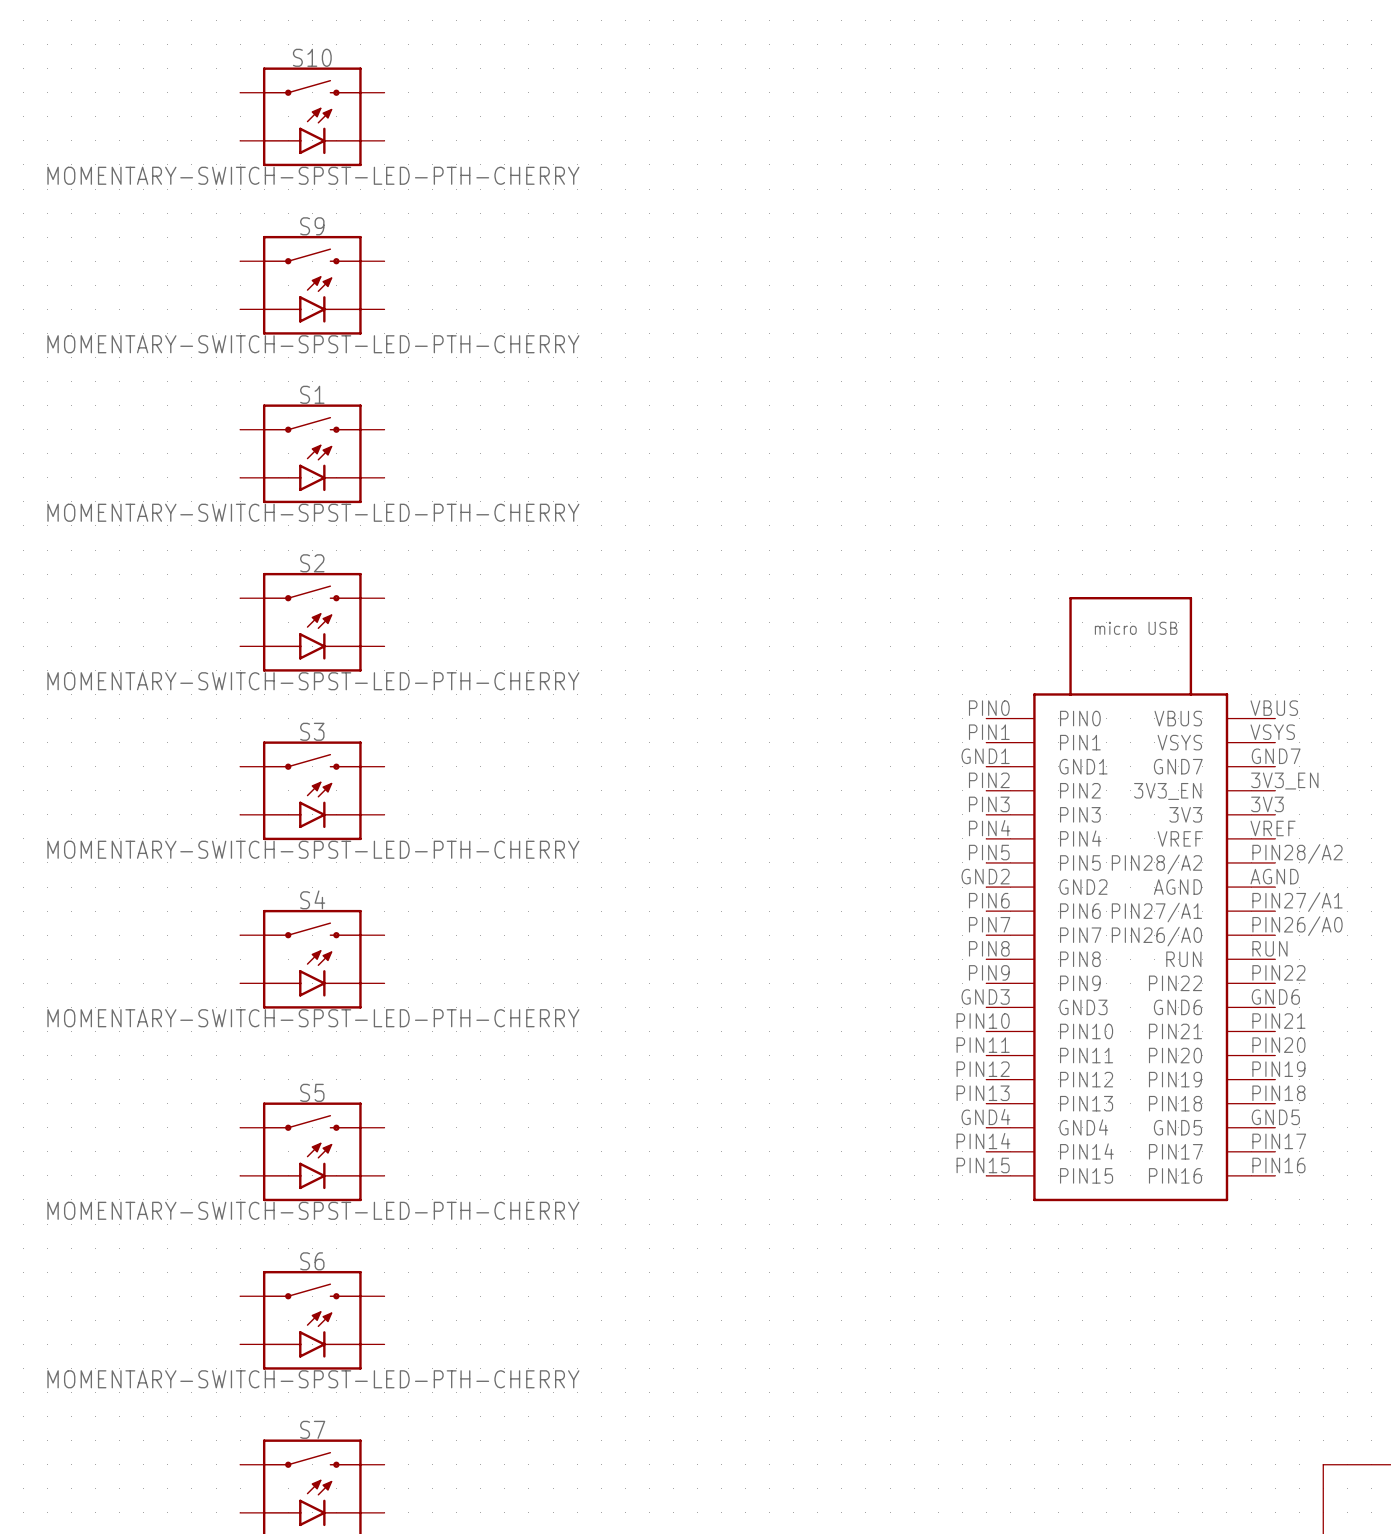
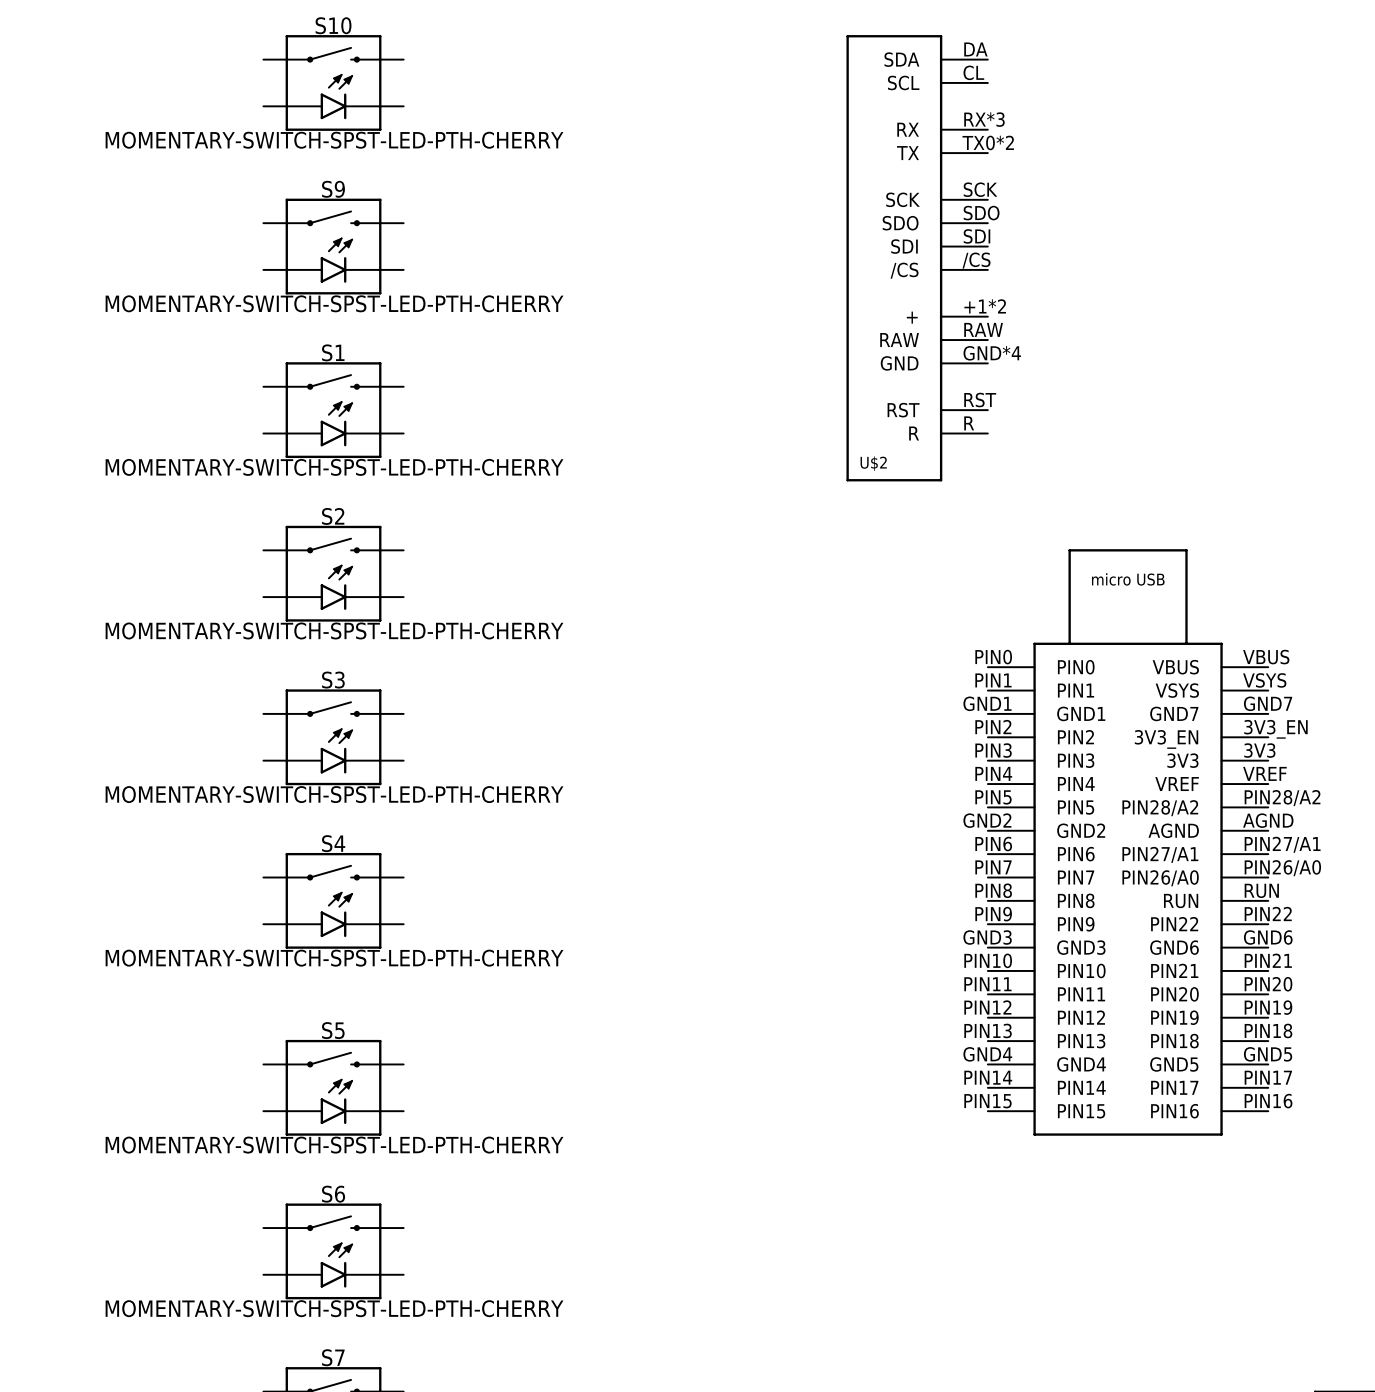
U$2: none -> (917, 258)

